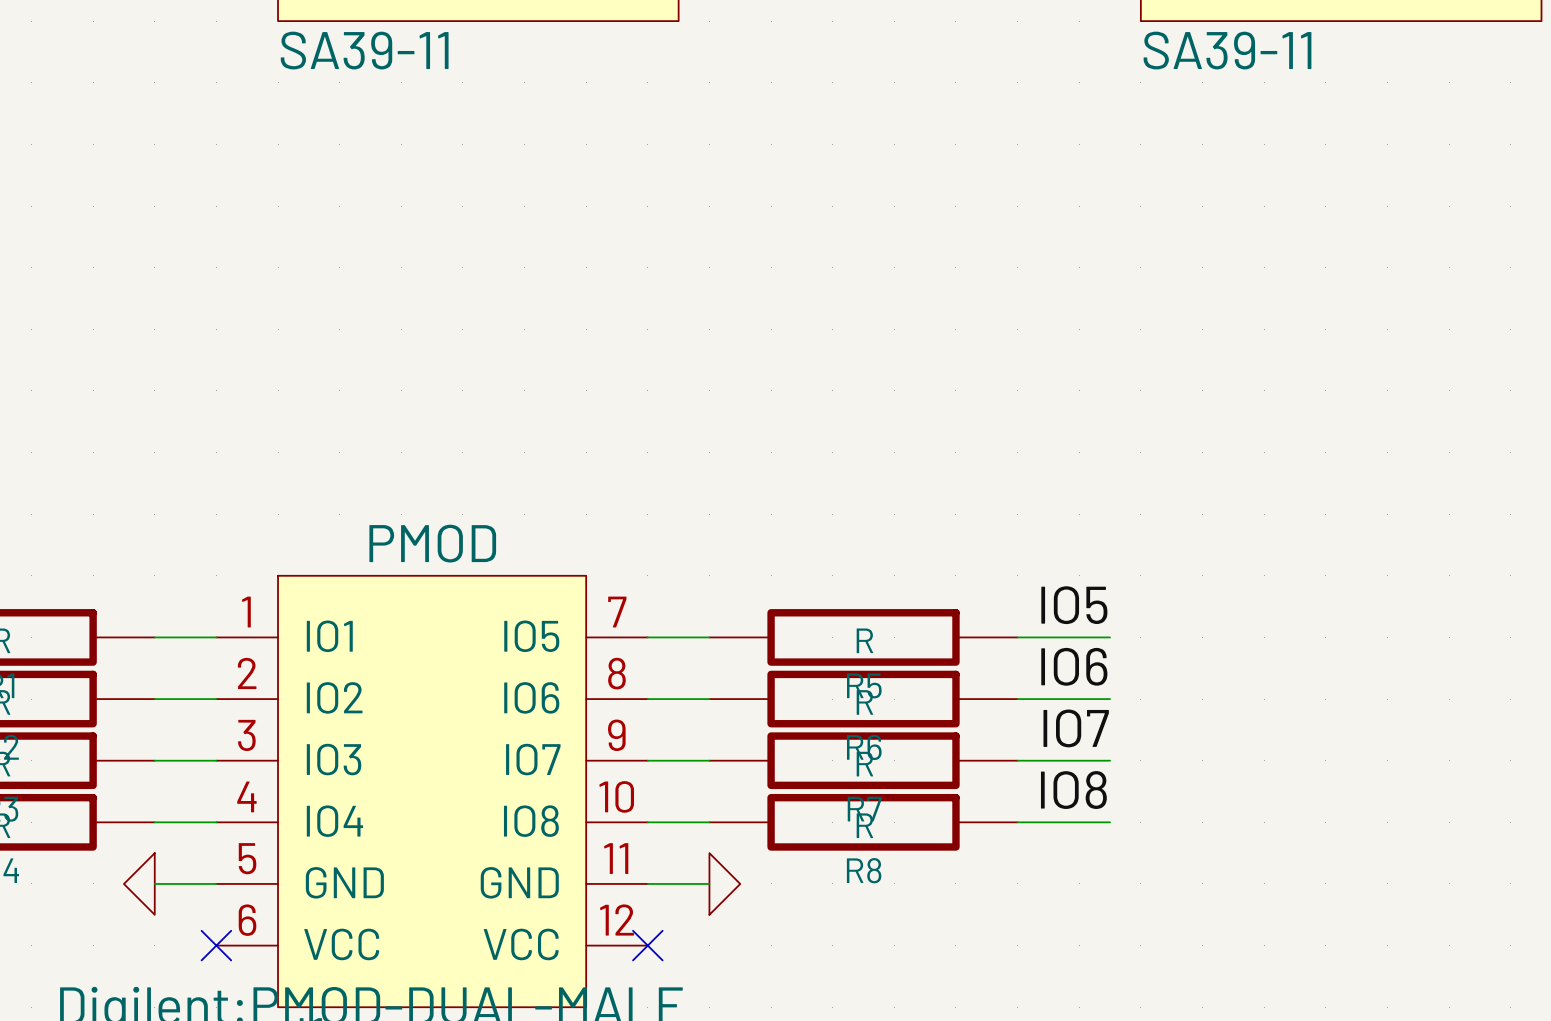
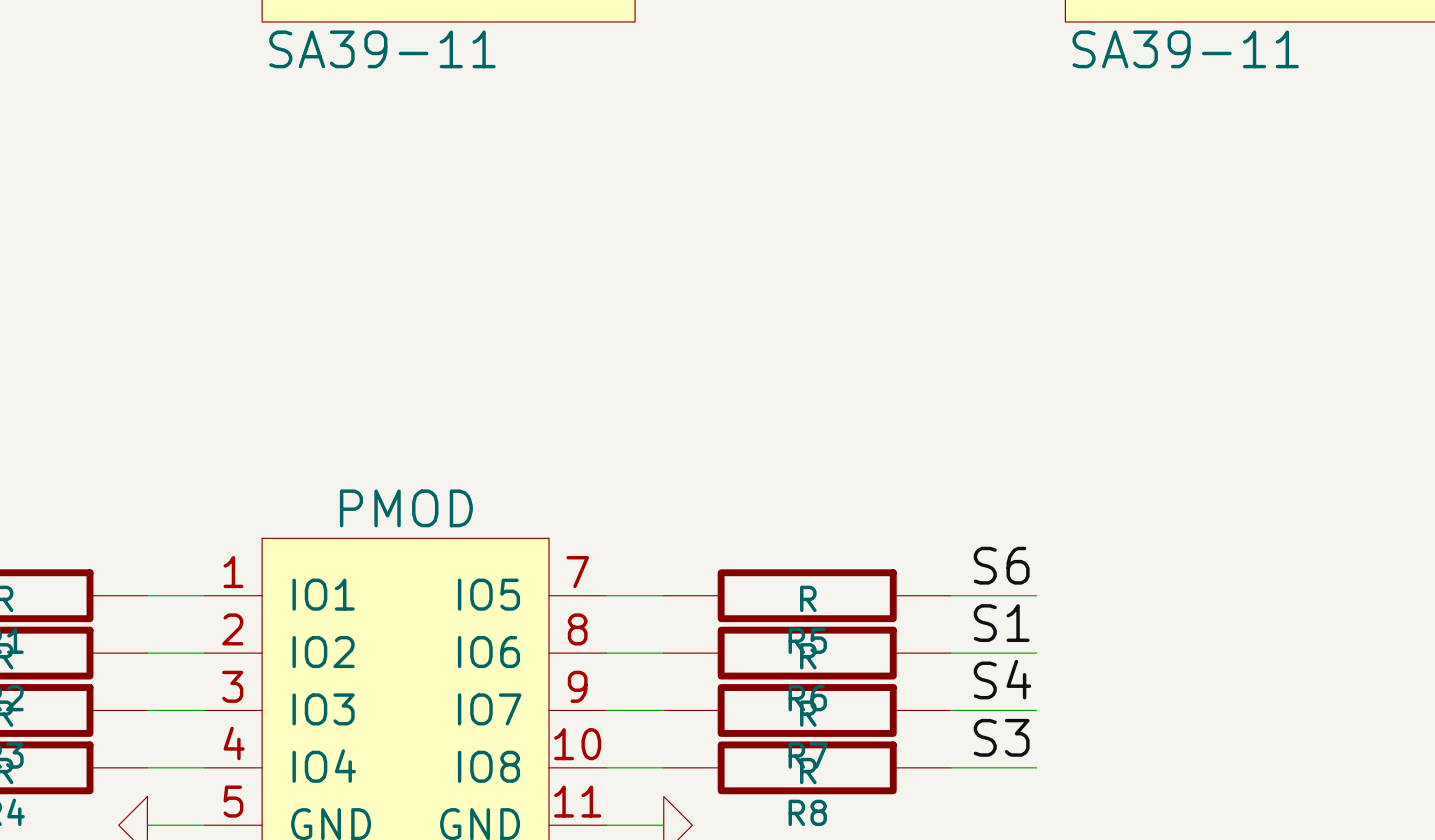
label: IO5 (1074, 605) -> S6 (1001, 565)
label: IO6 (1074, 666) -> S1 (1001, 623)
label: IO7 (1076, 728) -> S4 (1002, 679)
label: IO8 (1073, 790) -> S3 (1001, 737)

